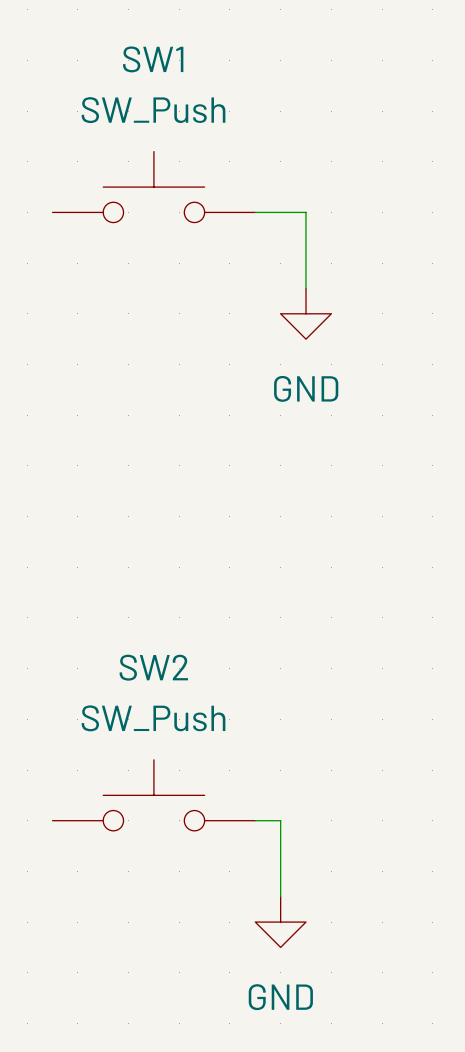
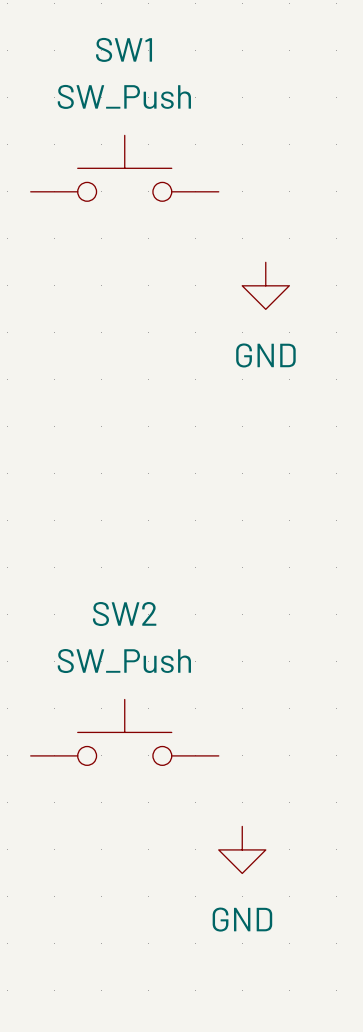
wire: (255, 212) (305, 212) (305, 288) -> none
wire: (255, 820) (280, 820) (280, 896) -> none

